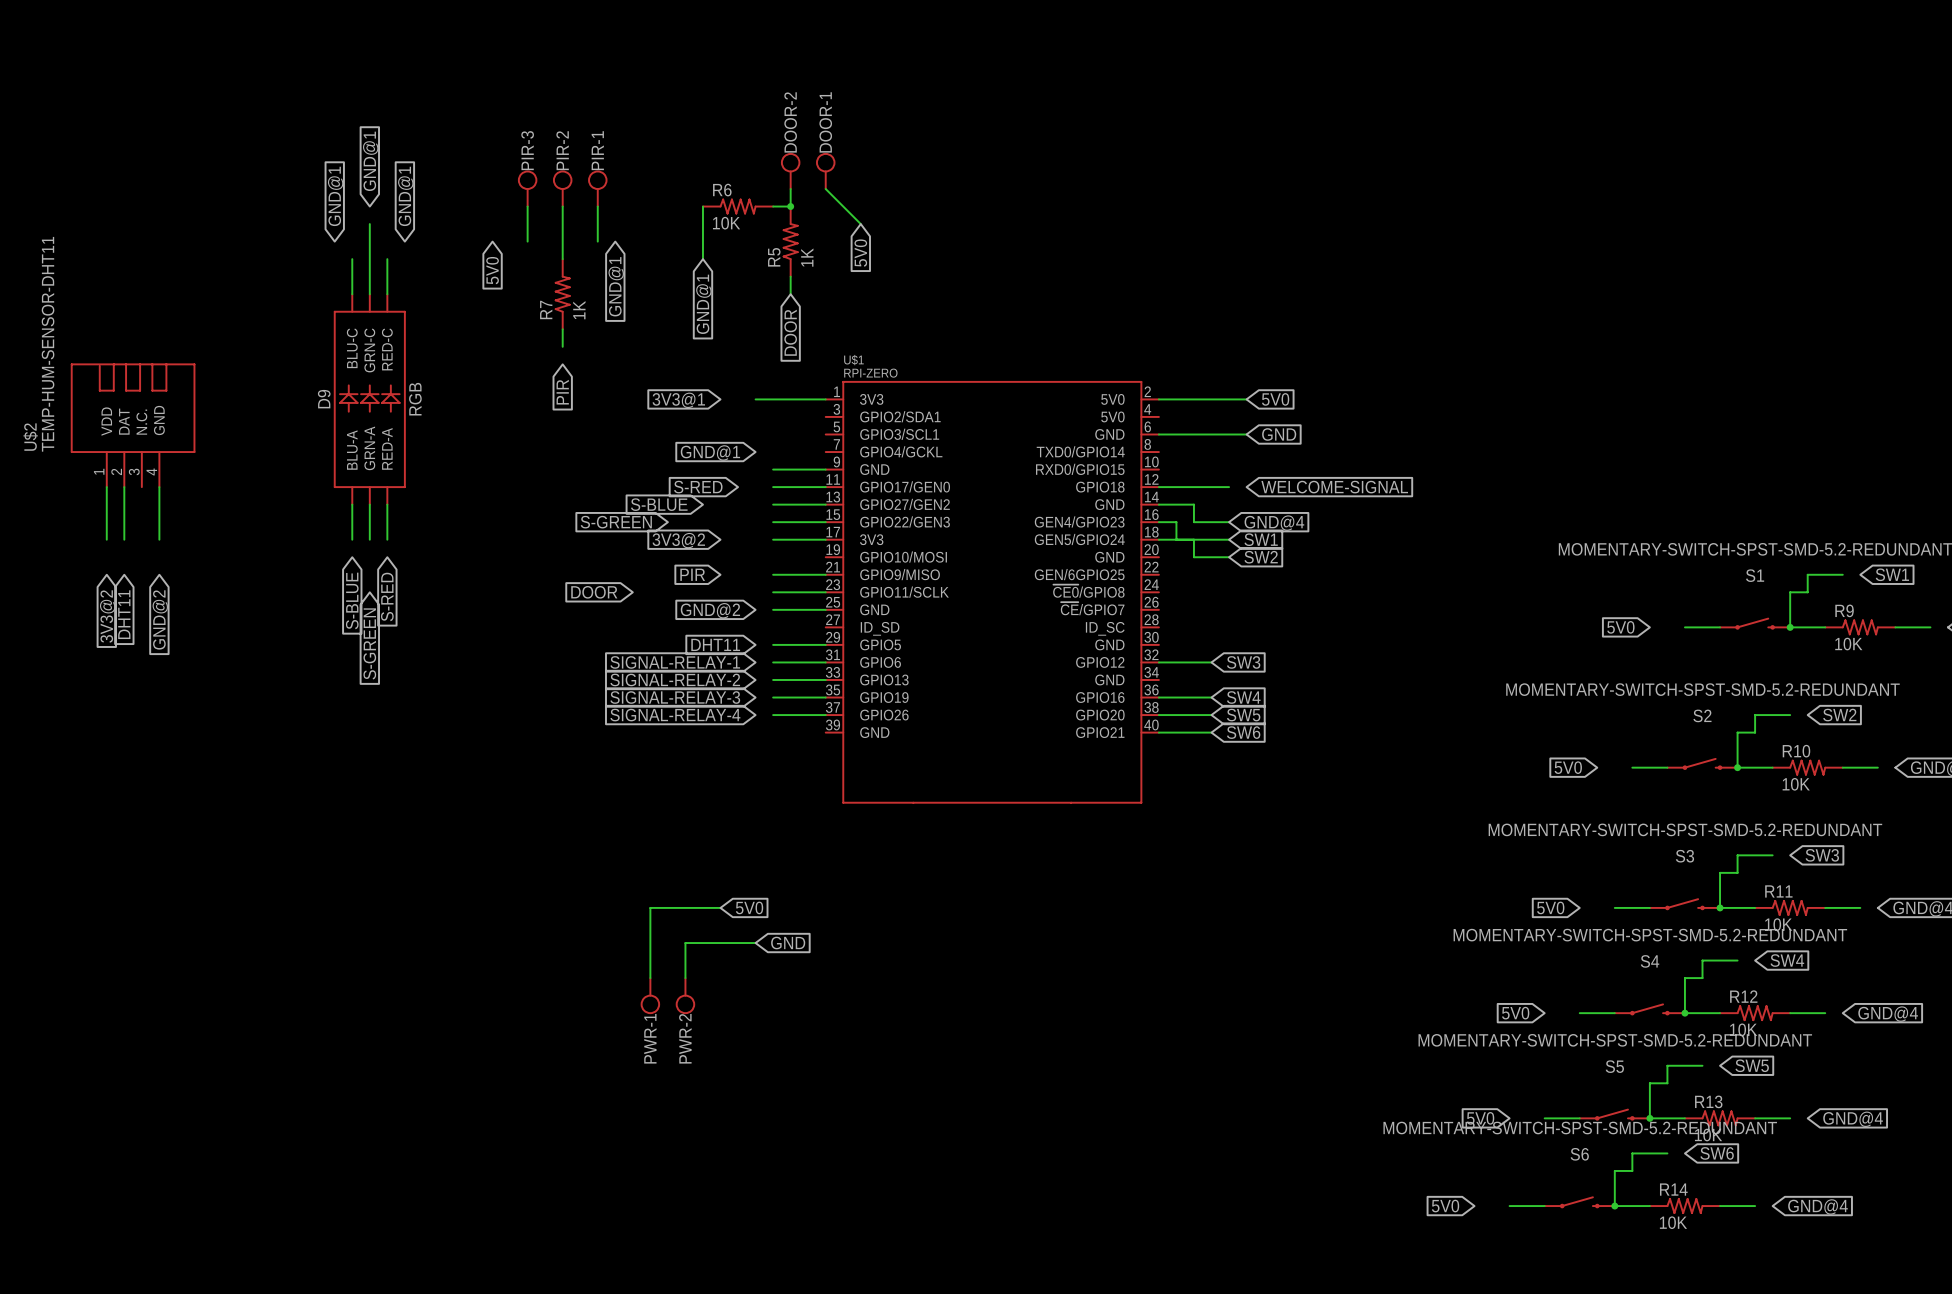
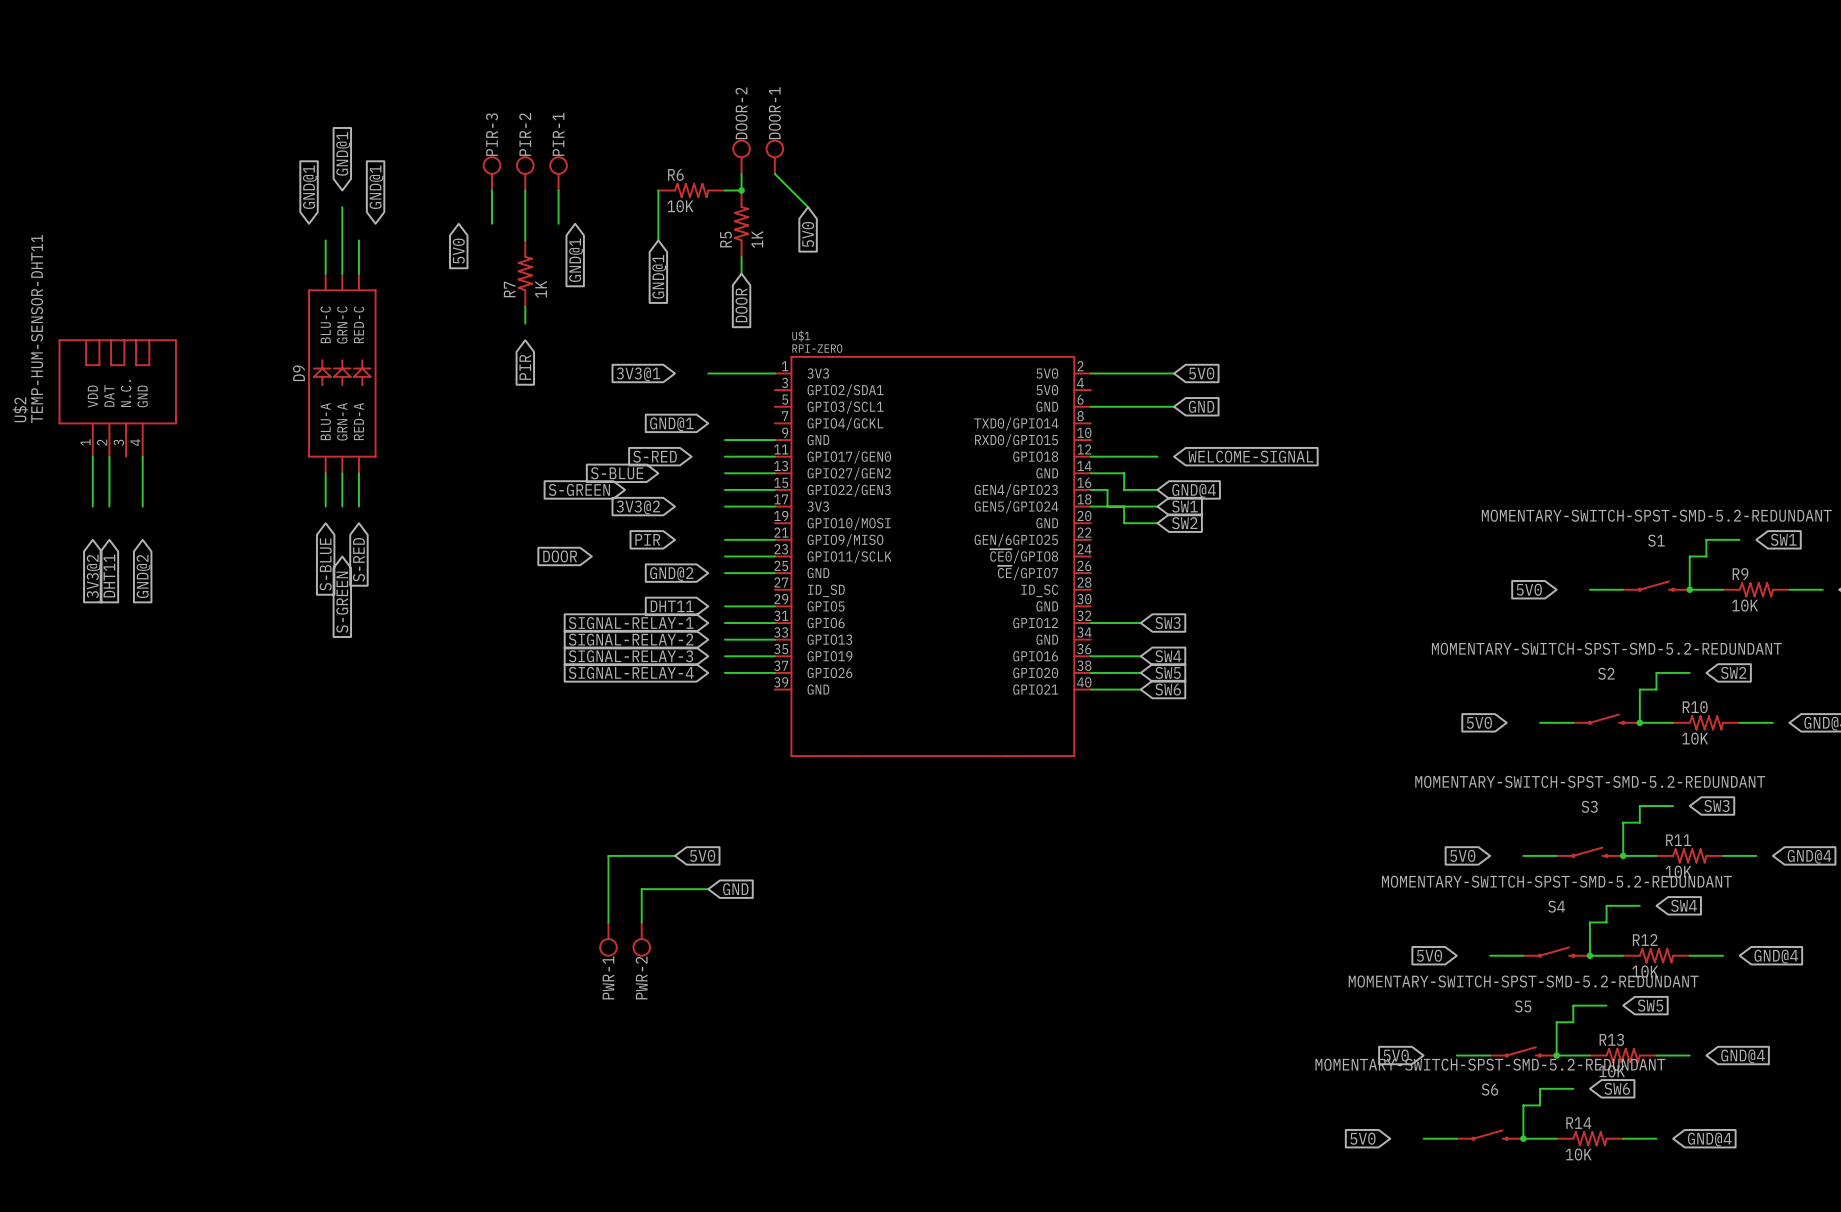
D9 value: RGB (415, 399) -> none

